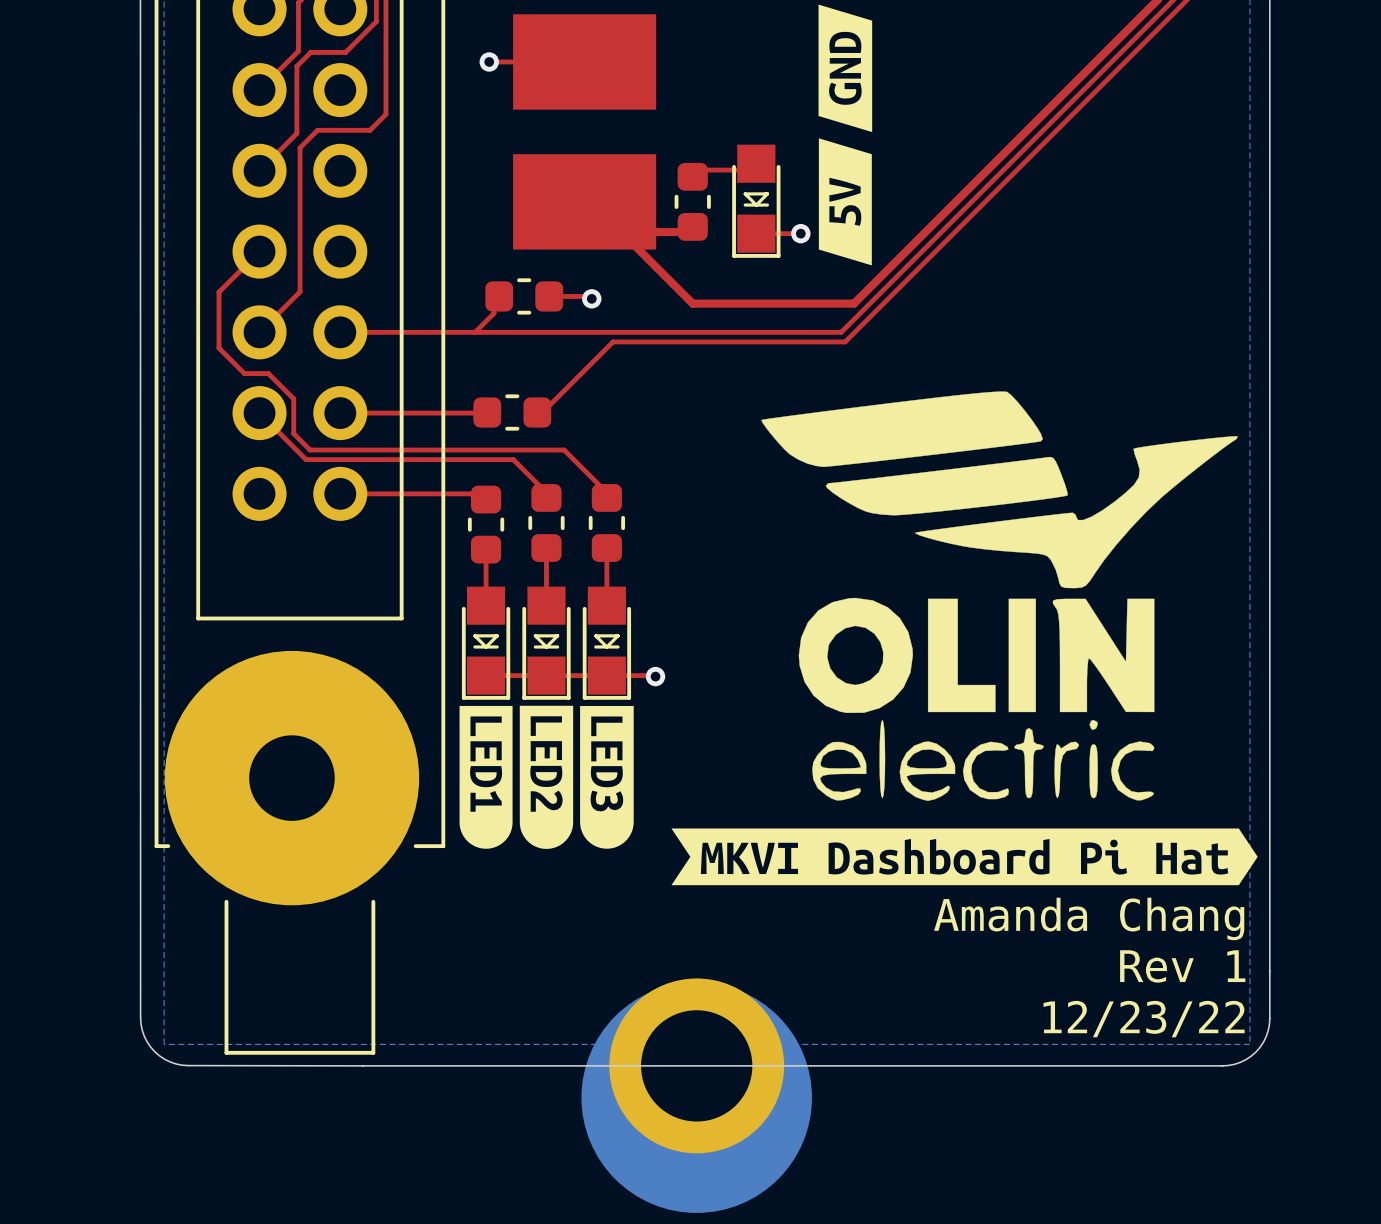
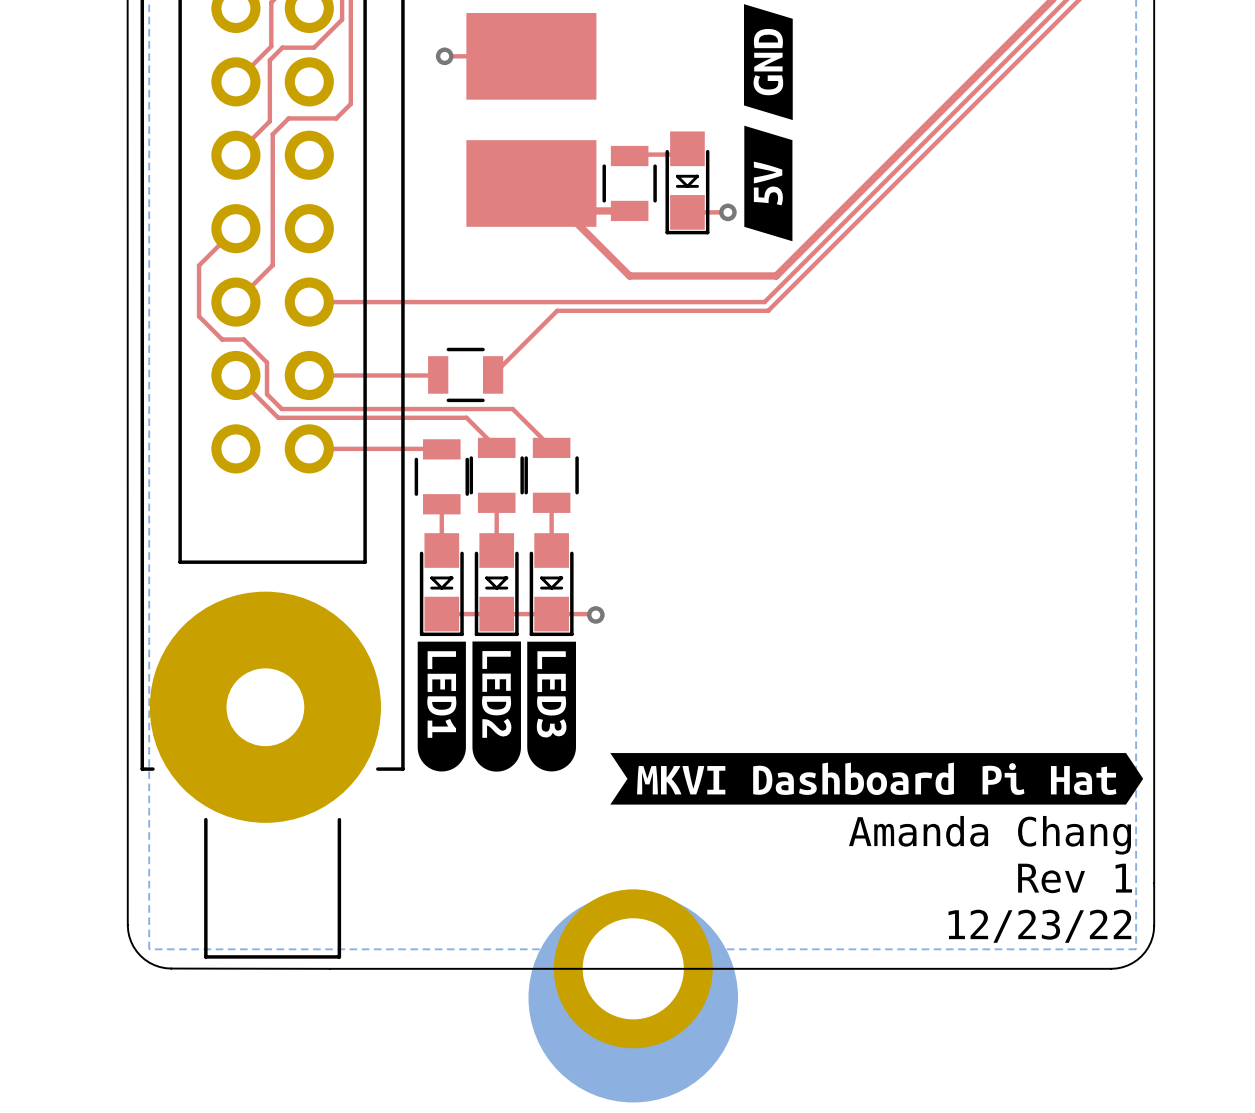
part footprint: [674, 162, 711, 241] -> [602, 145, 657, 222]
top track: (494, 296) (494, 313) (475, 332) -> none
part: (524, 296) -> none
top track: (554, 296) (589, 296) (591, 298) -> none
via: (591, 298) -> none
drawing: [761, 391, 1238, 801] -> none
part footprint: [473, 394, 552, 431] -> [428, 347, 504, 403]
part footprint: [528, 484, 565, 562] -> [469, 437, 524, 513]
part footprint: [588, 484, 626, 562] -> [524, 437, 579, 513]
part footprint: [467, 485, 505, 564] -> [414, 439, 469, 515]

